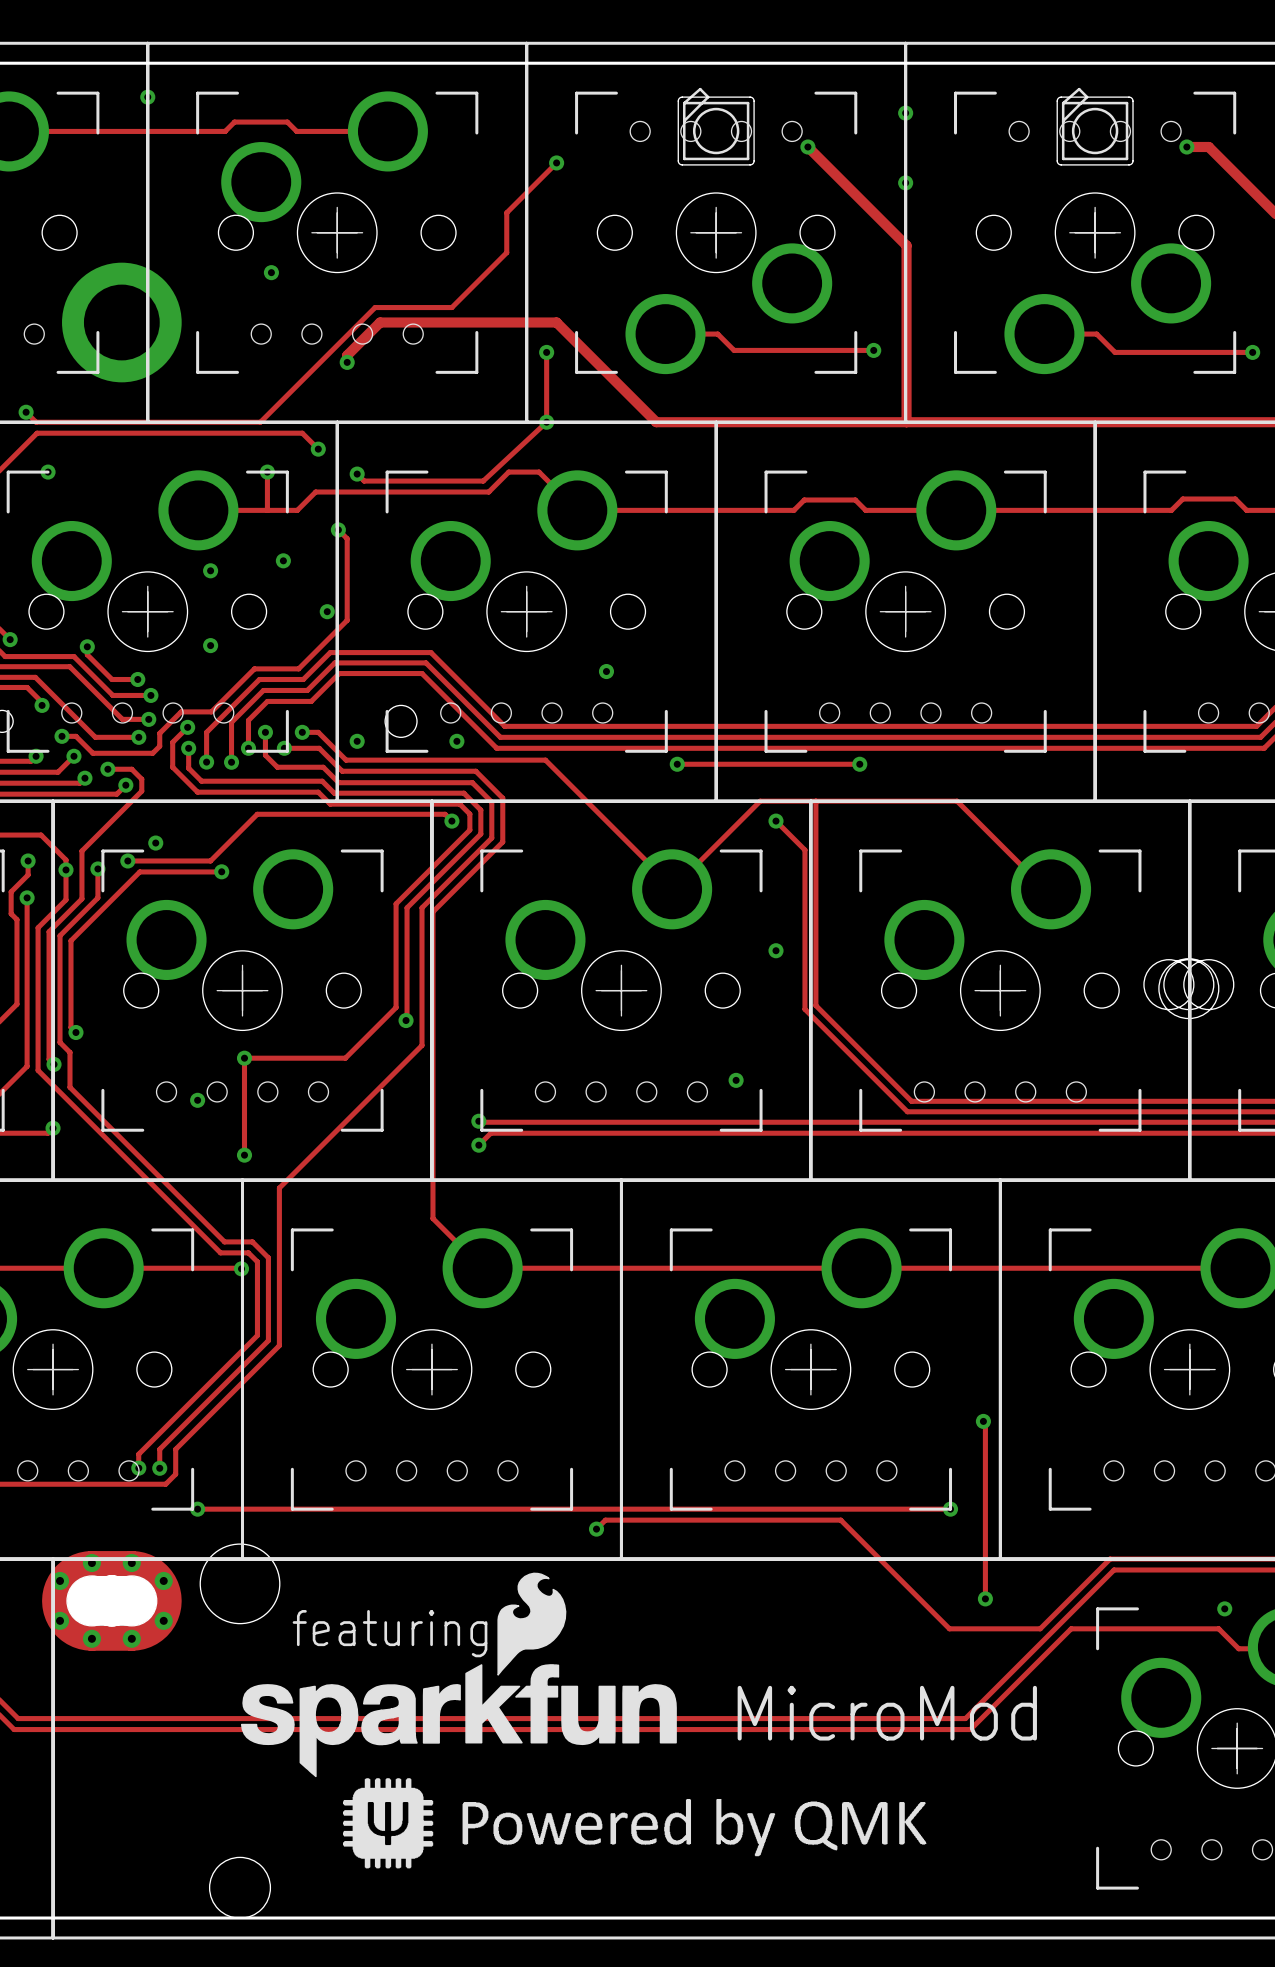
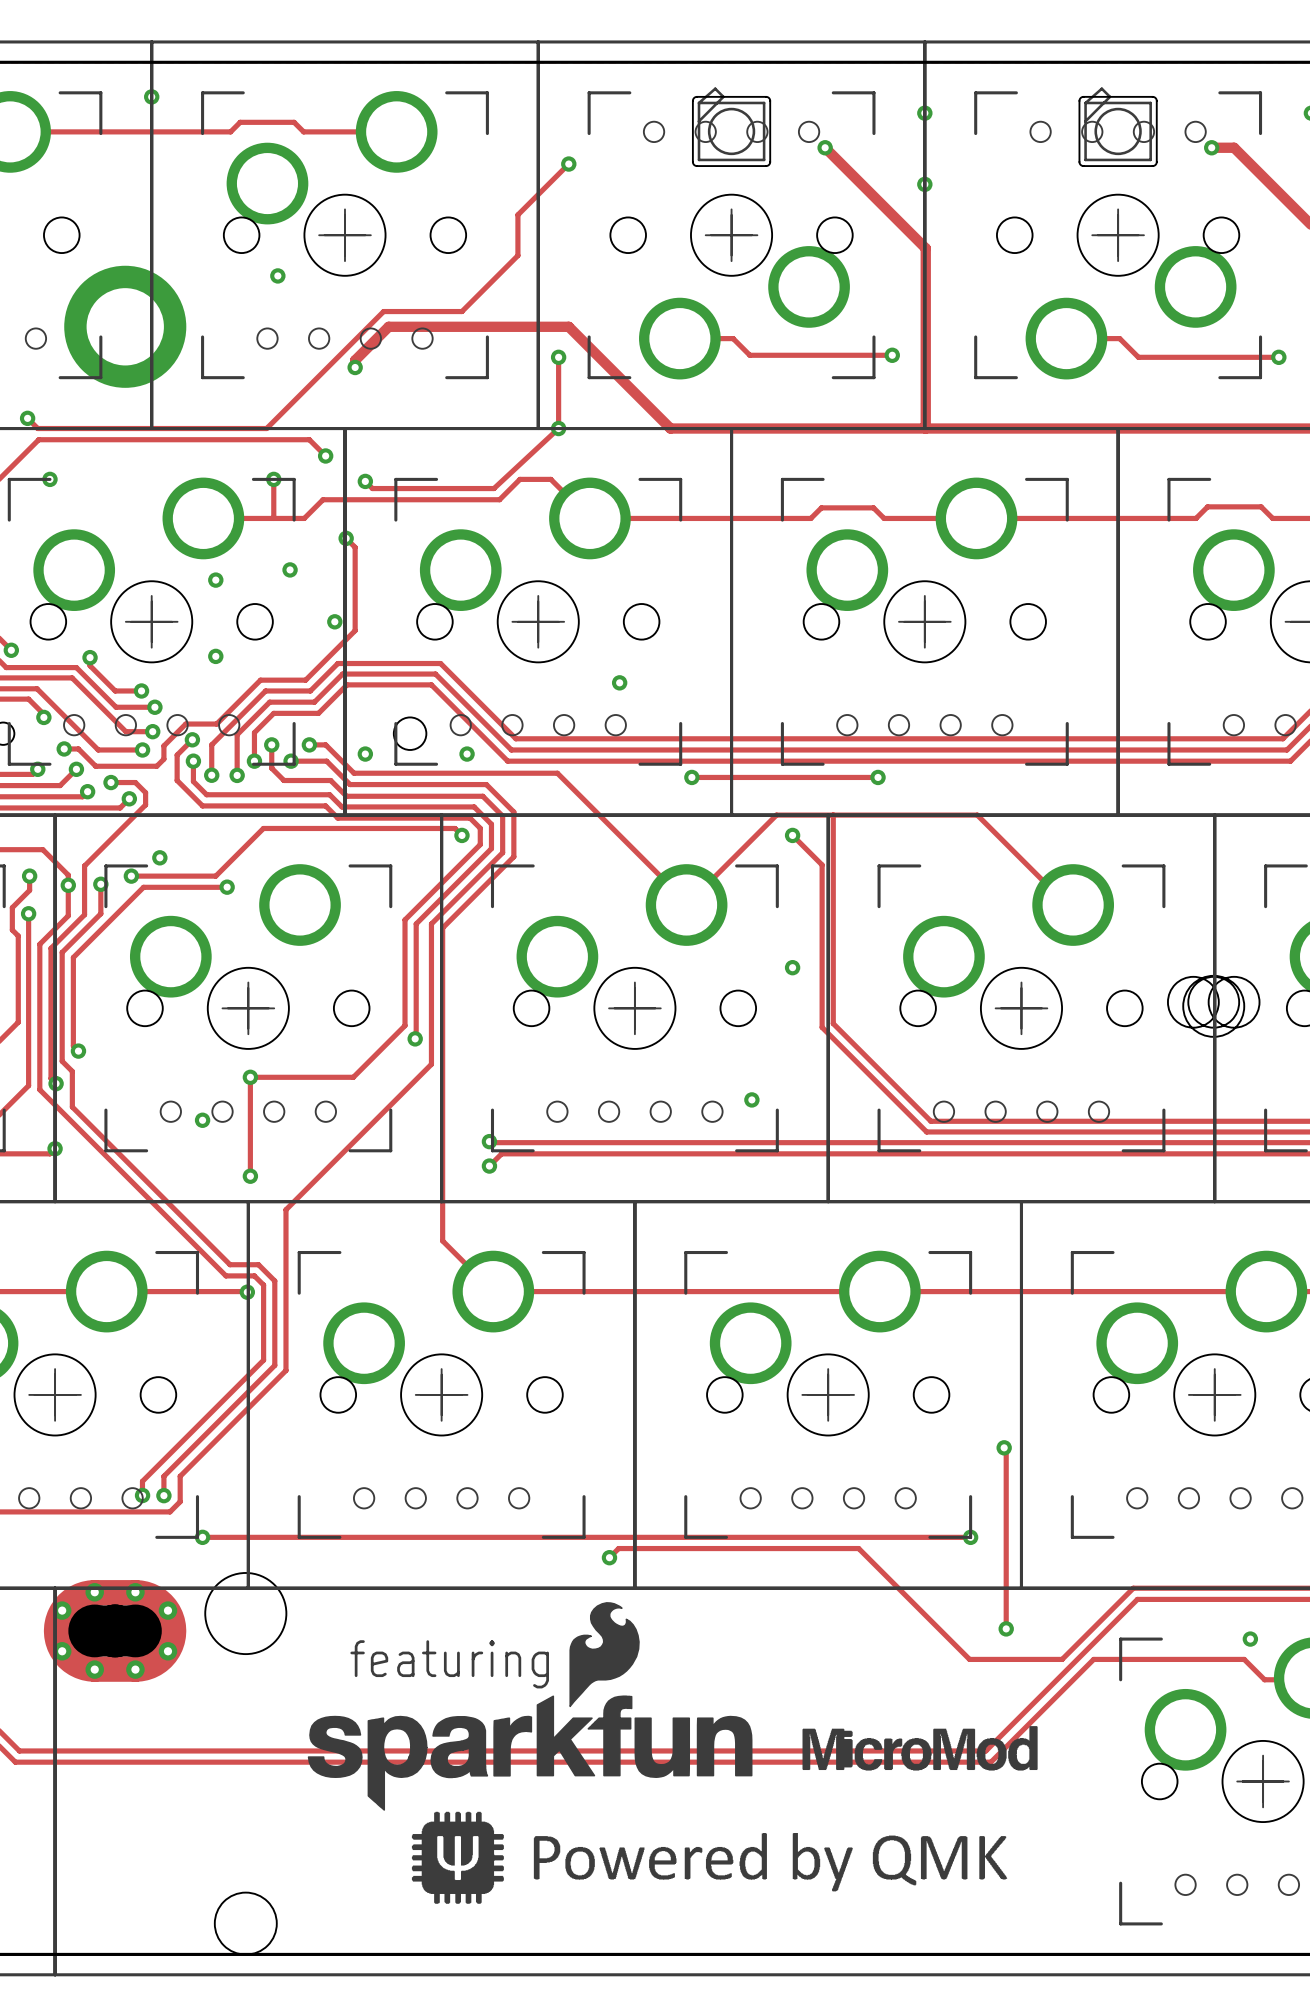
text position: featuring (390, 1633) -> featuring (449, 1664)
drawing position: (458, 1674) -> (530, 1706)
drawing: none -> [802, 1726, 1038, 1771]
text: MicroMod (887, 1713) -> none
drawing position: (634, 1823) -> (709, 1857)

